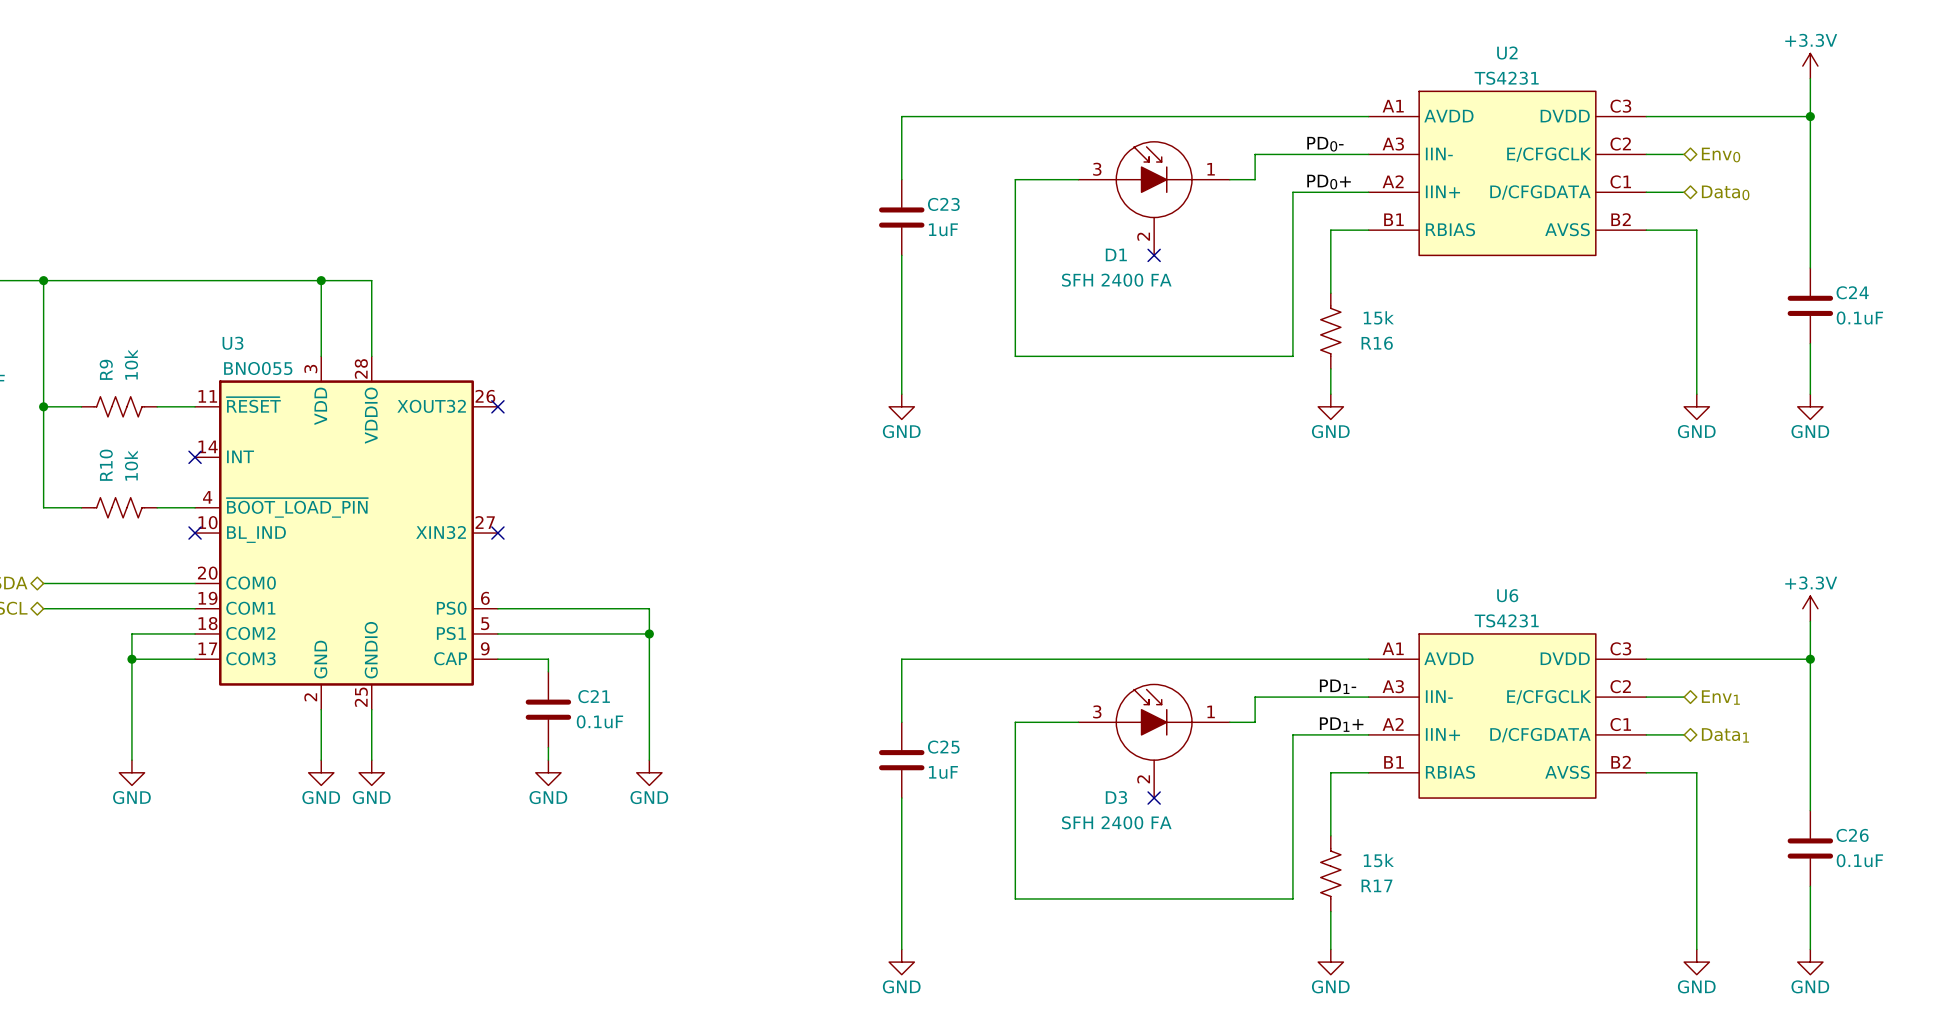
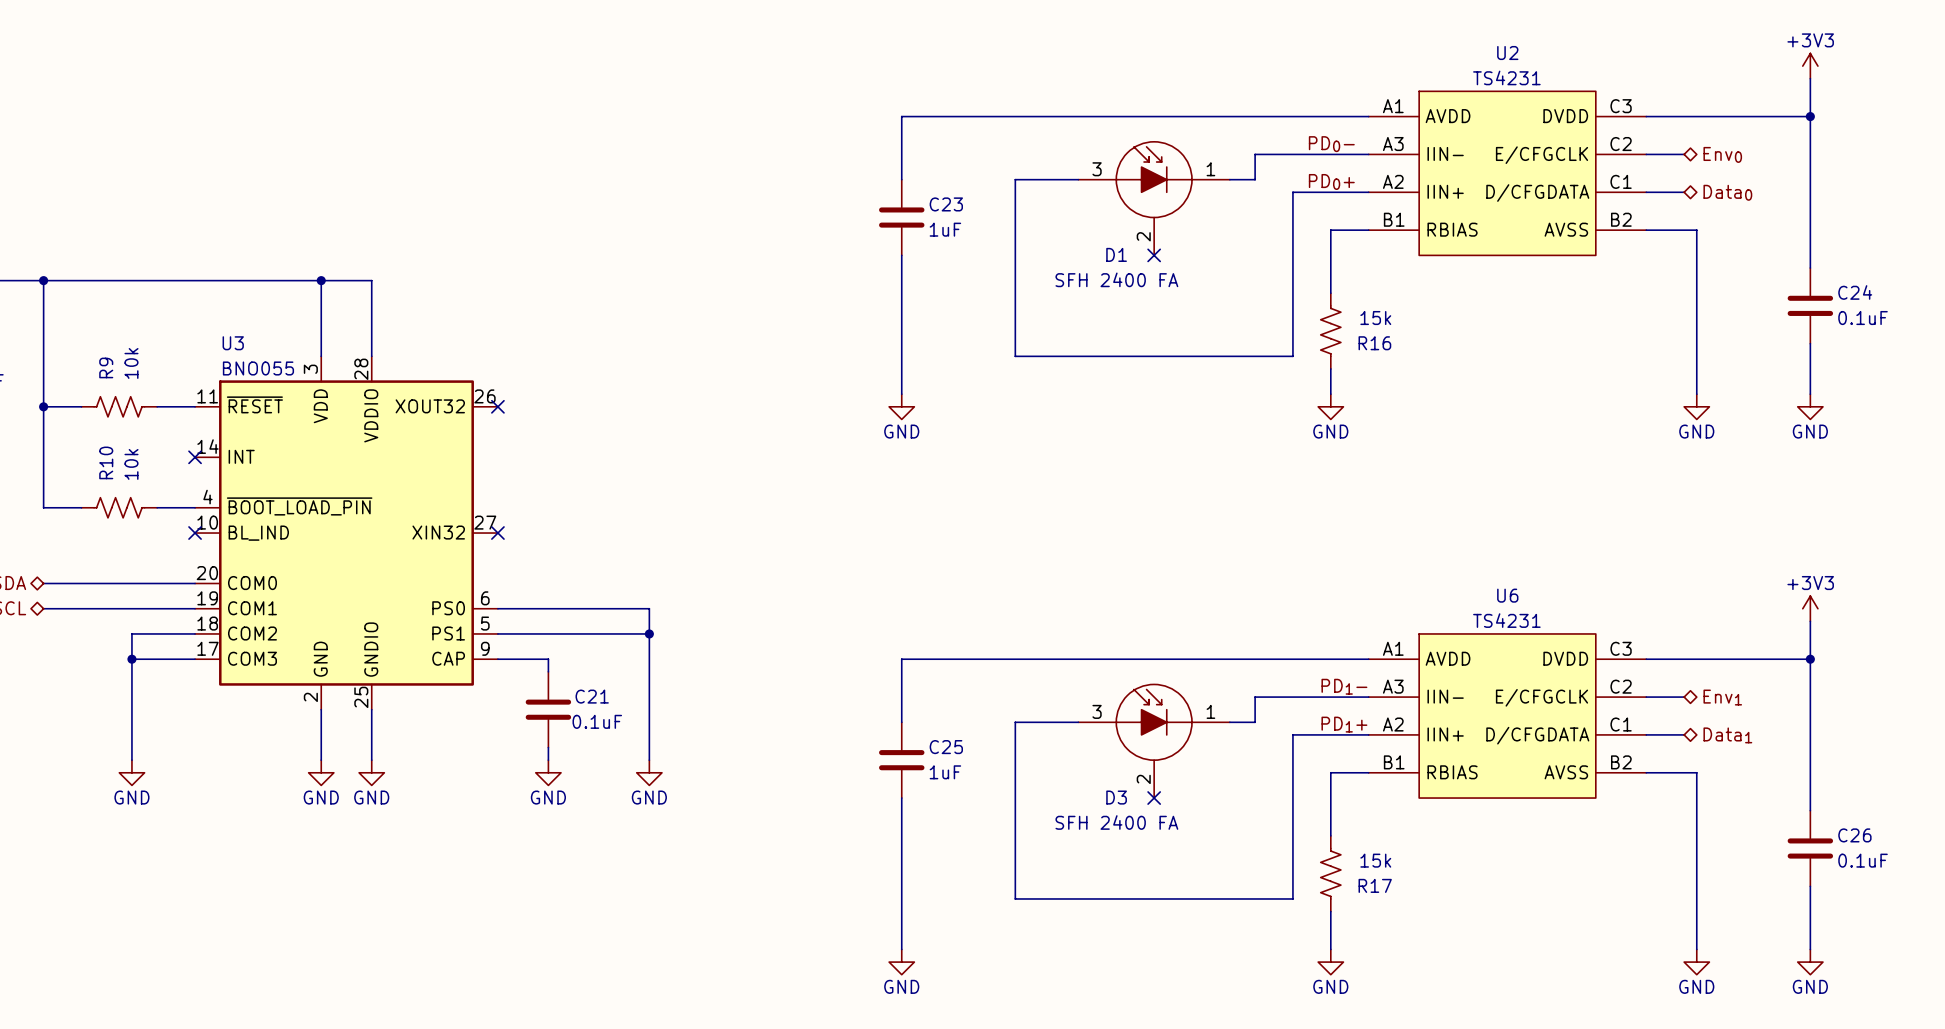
power symbol: +3.3V (1810, 66) -> +3V3 (1810, 66)
power symbol: +3.3V (1810, 608) -> +3V3 (1810, 608)

